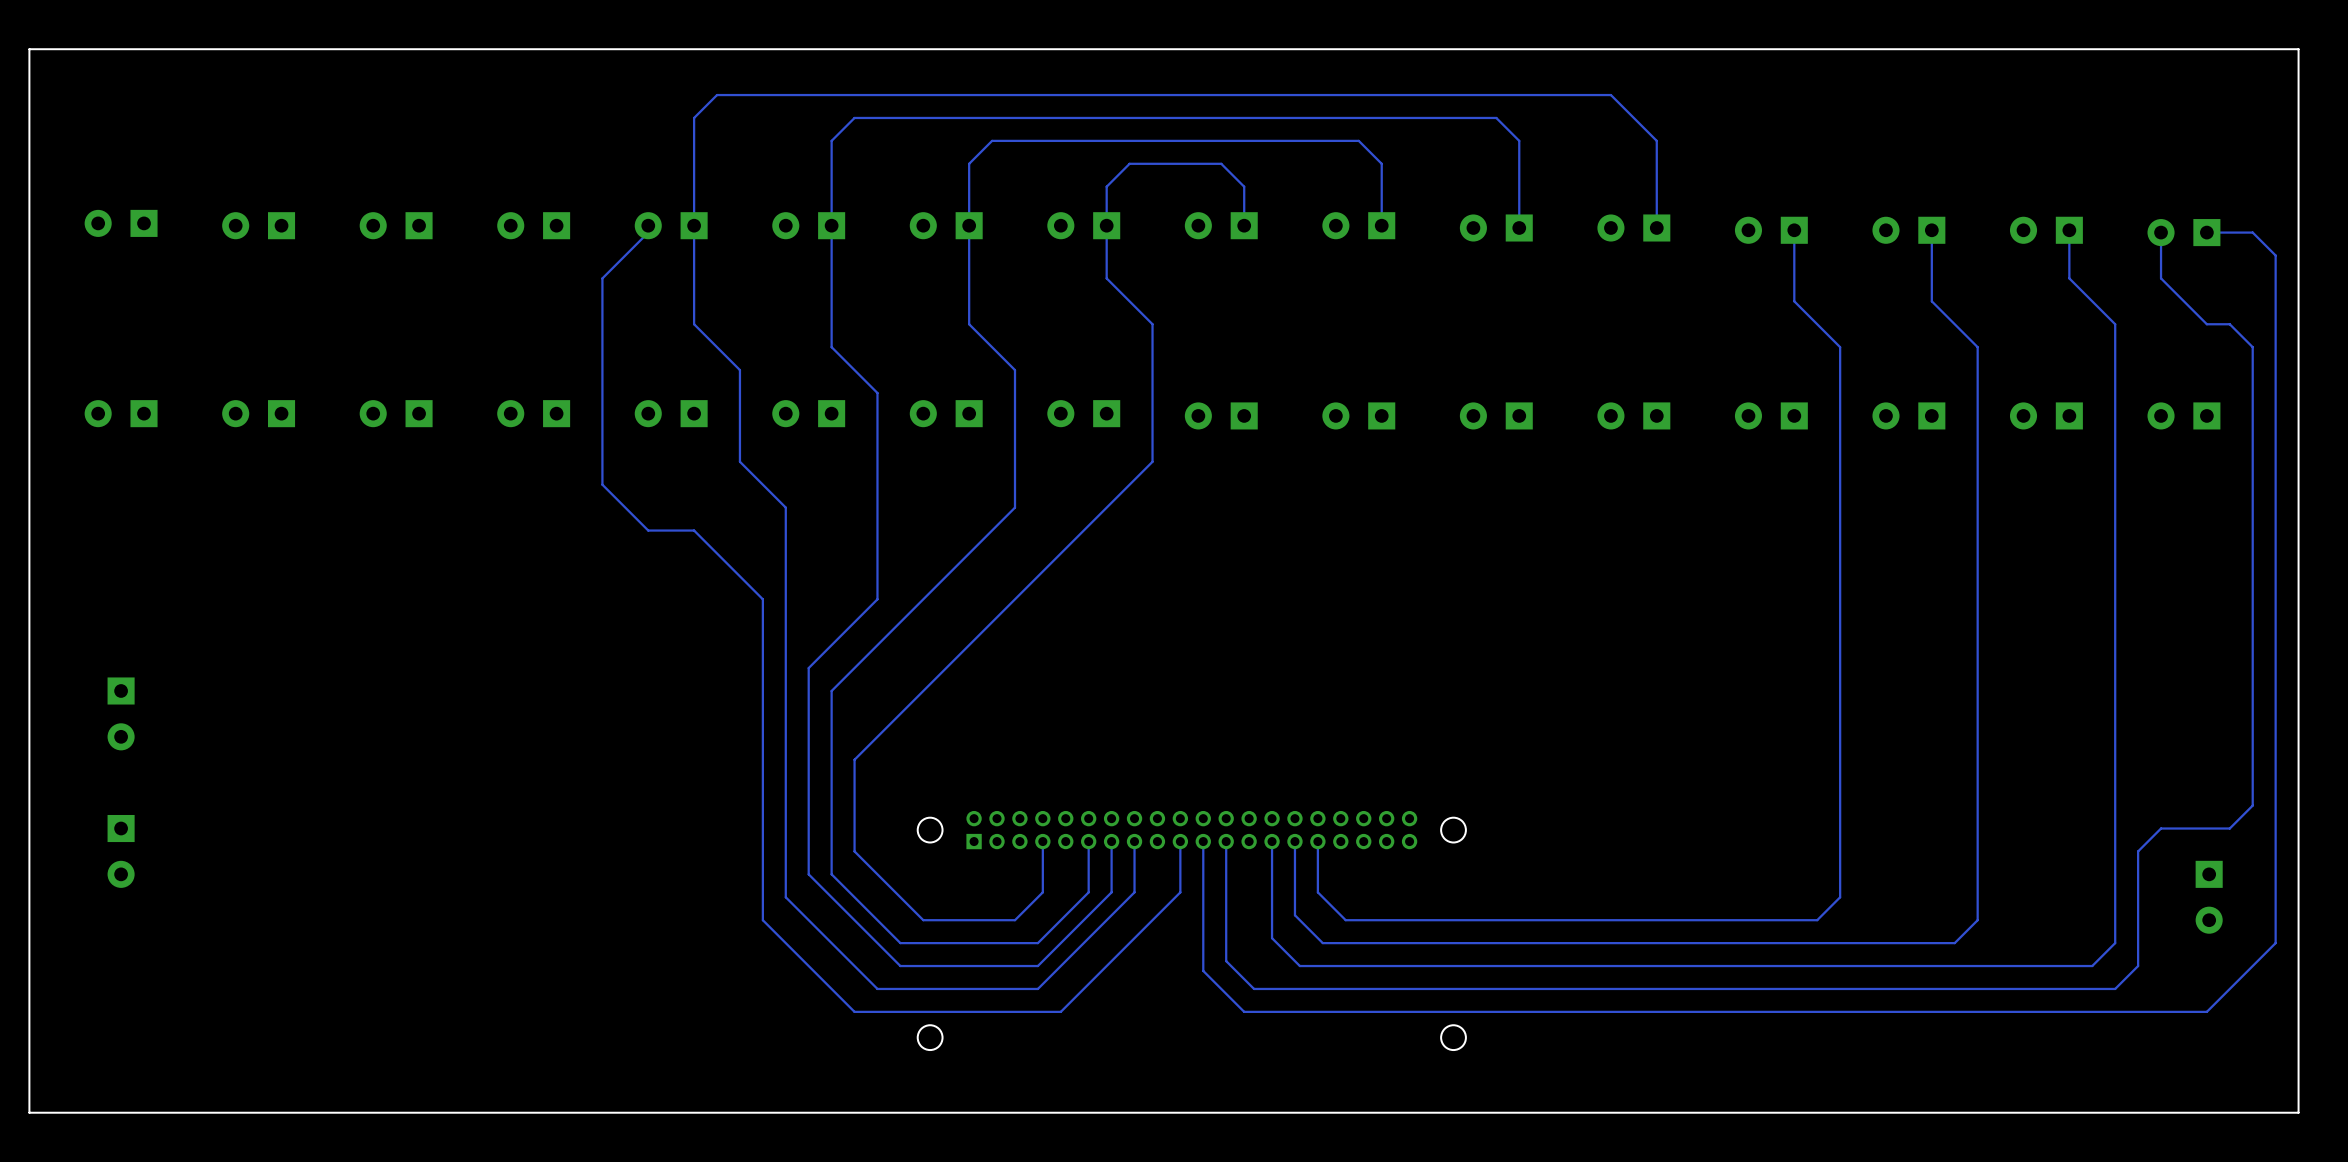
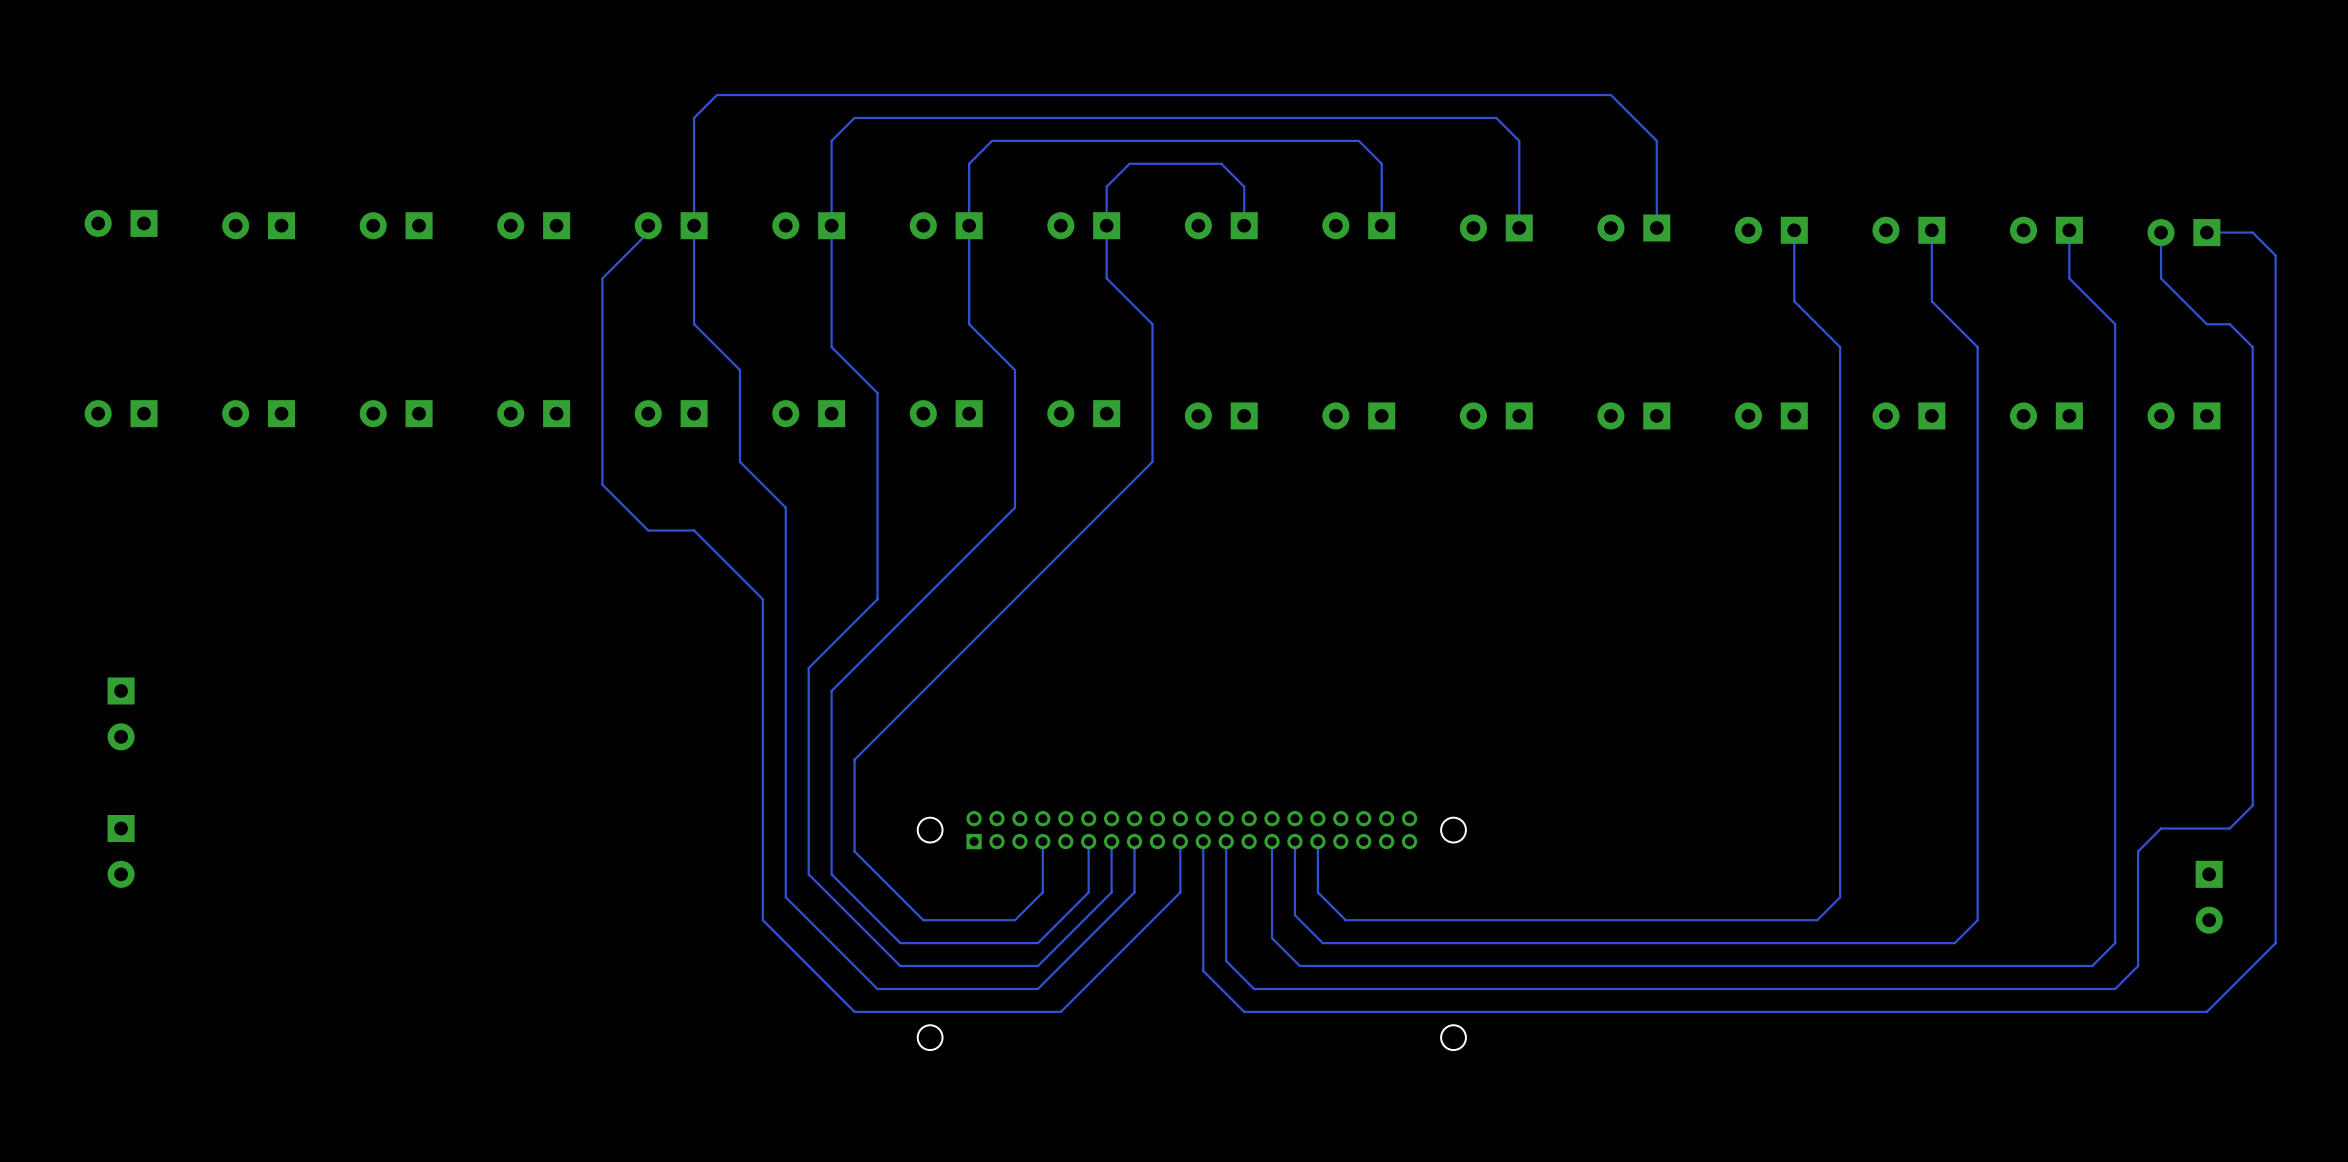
board edge: (2298, 49) (29, 49) (29, 1112) (2298, 1112) (2298, 49) -> none

